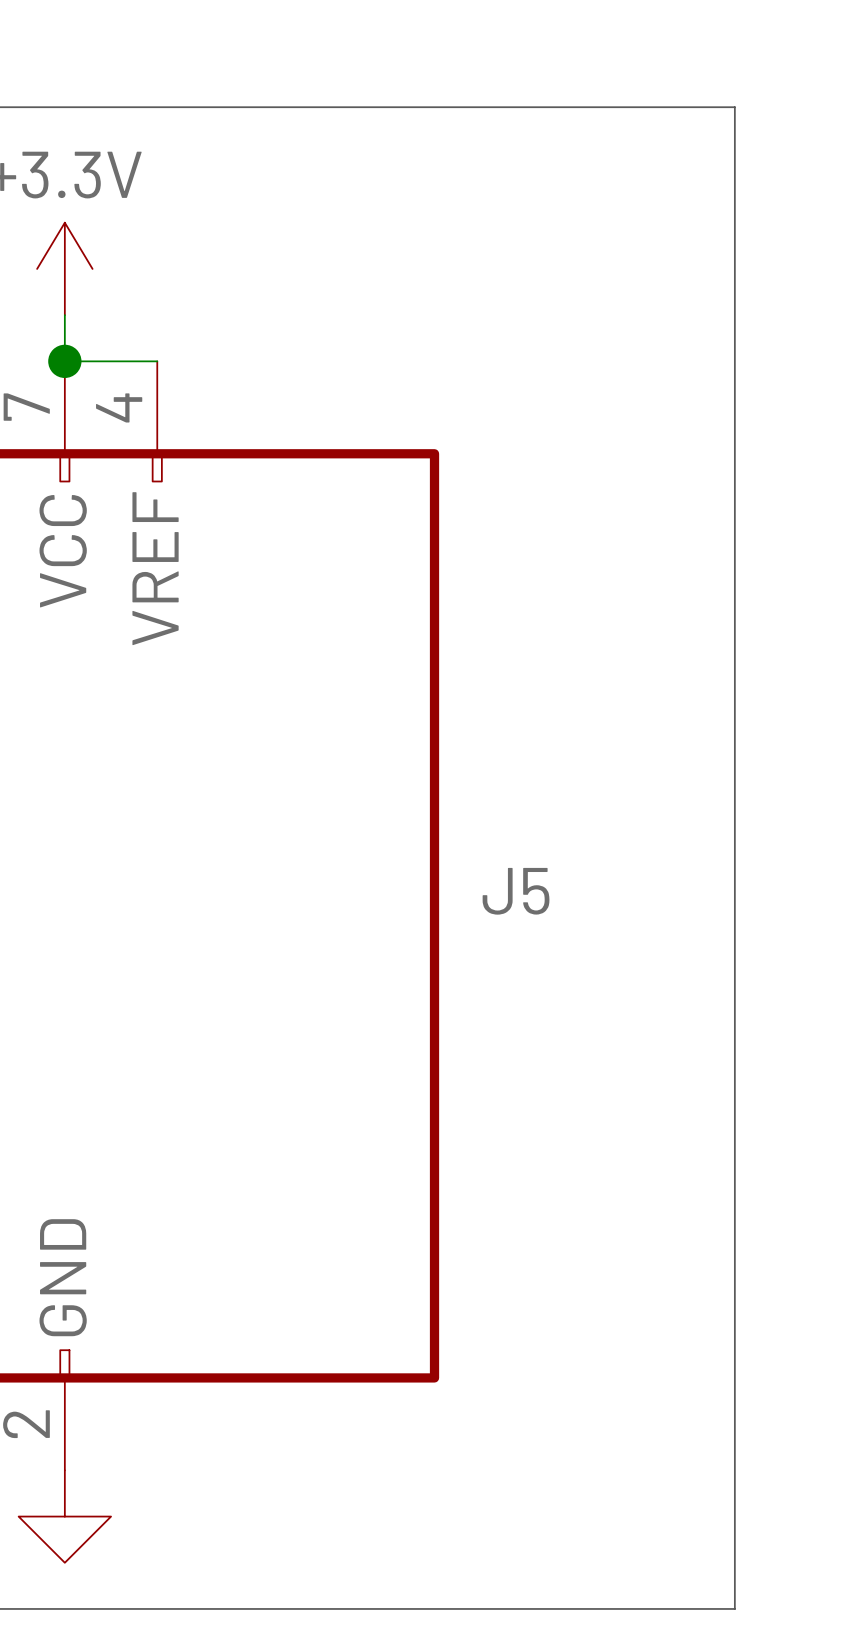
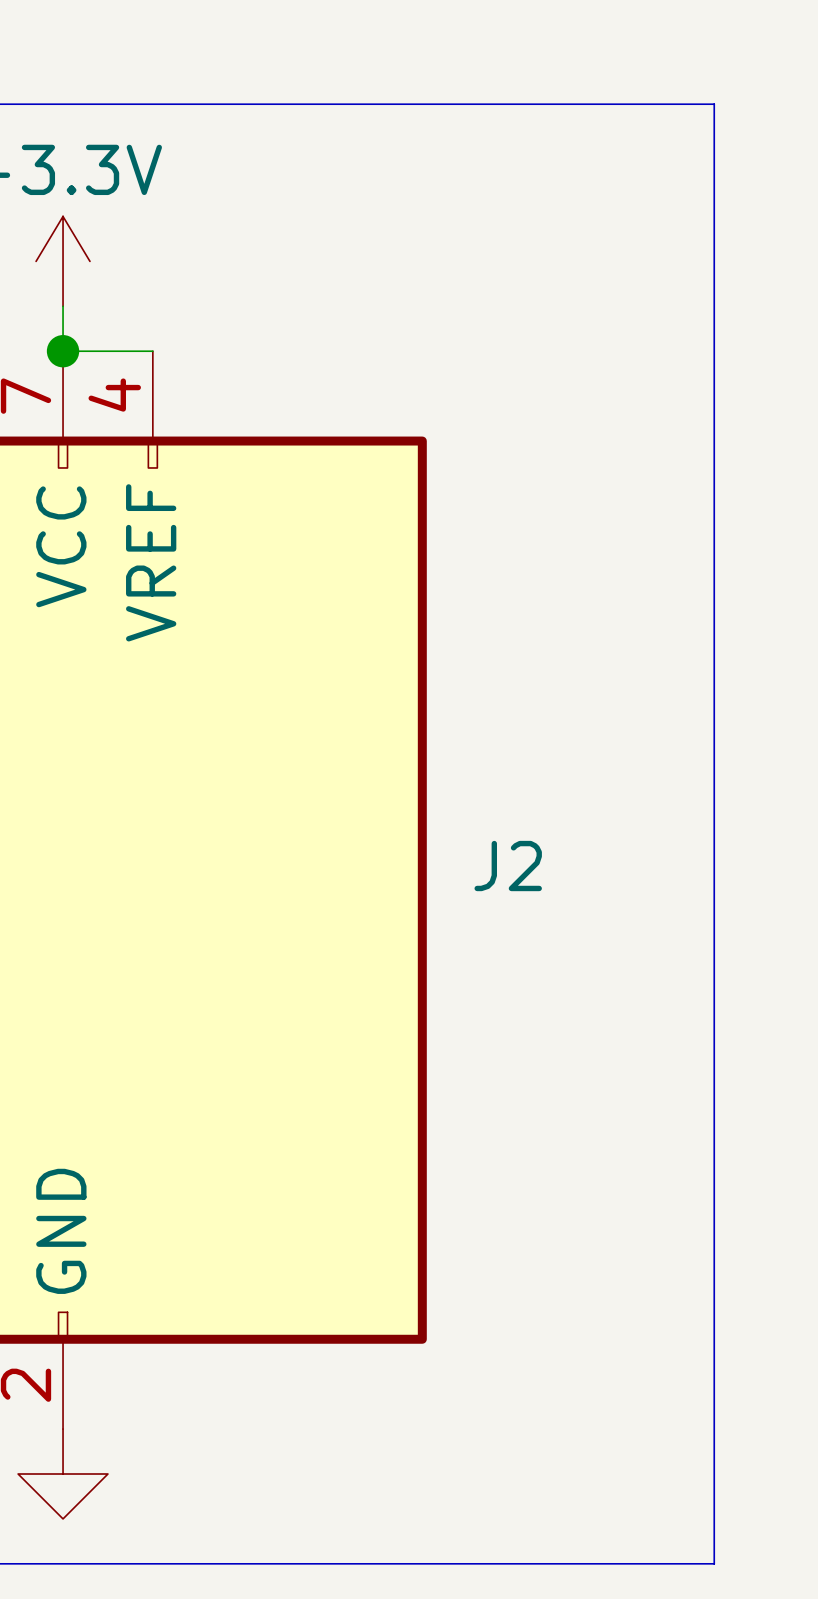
J5 name: J5 (516, 891) -> J2 (508, 866)

